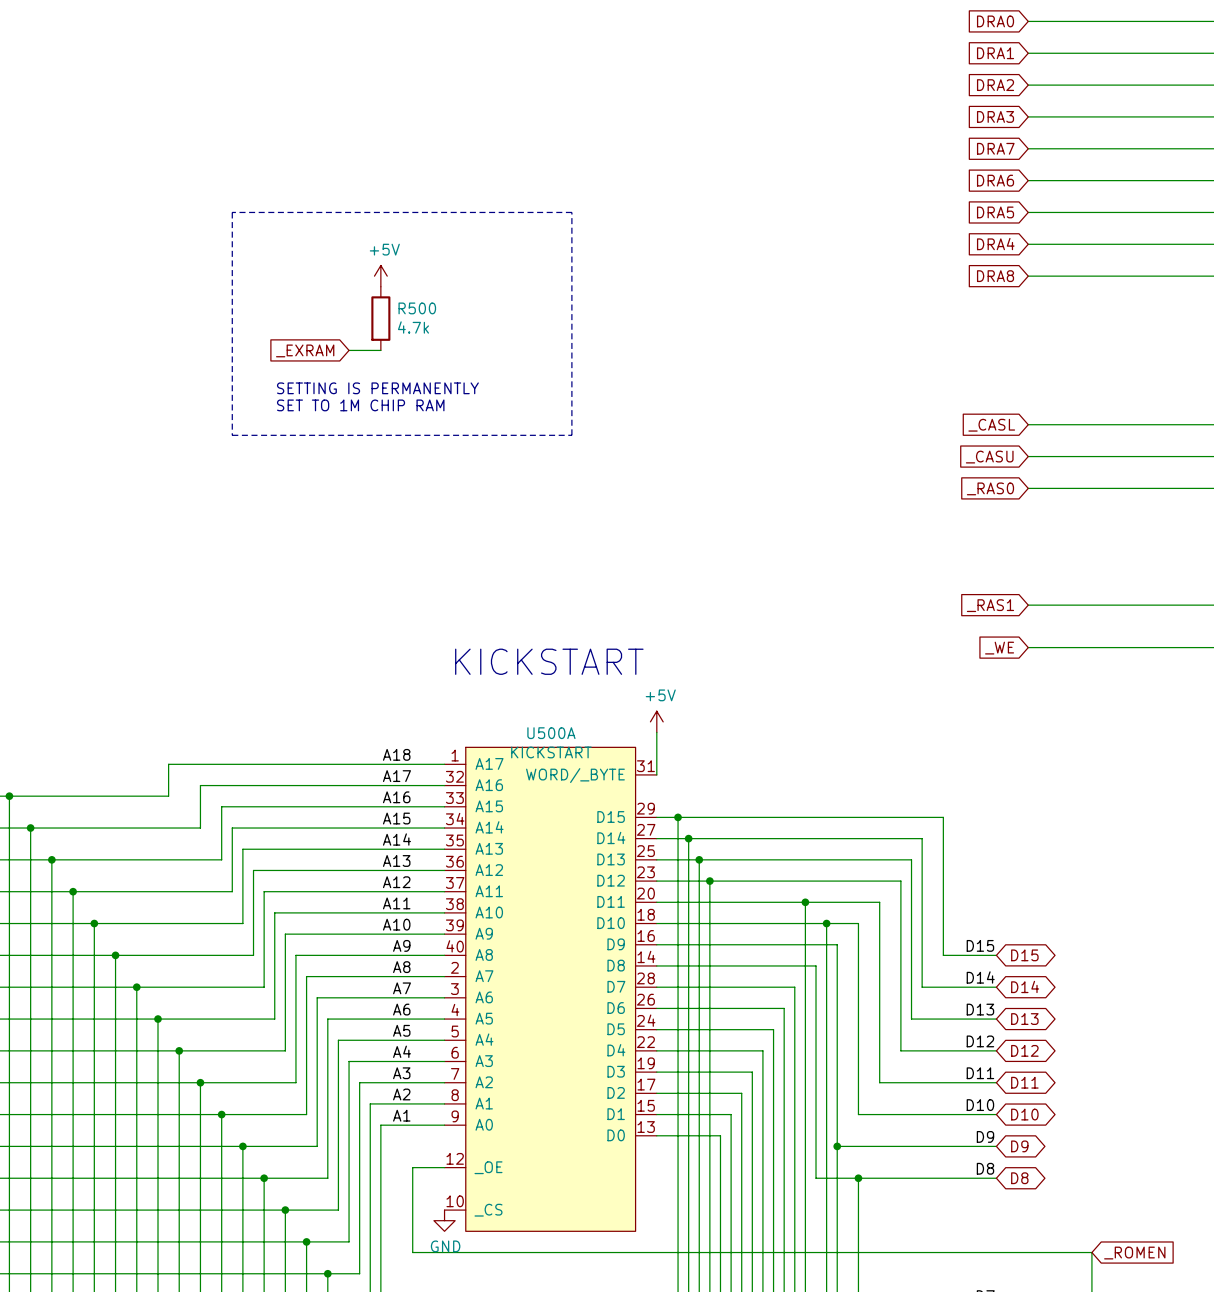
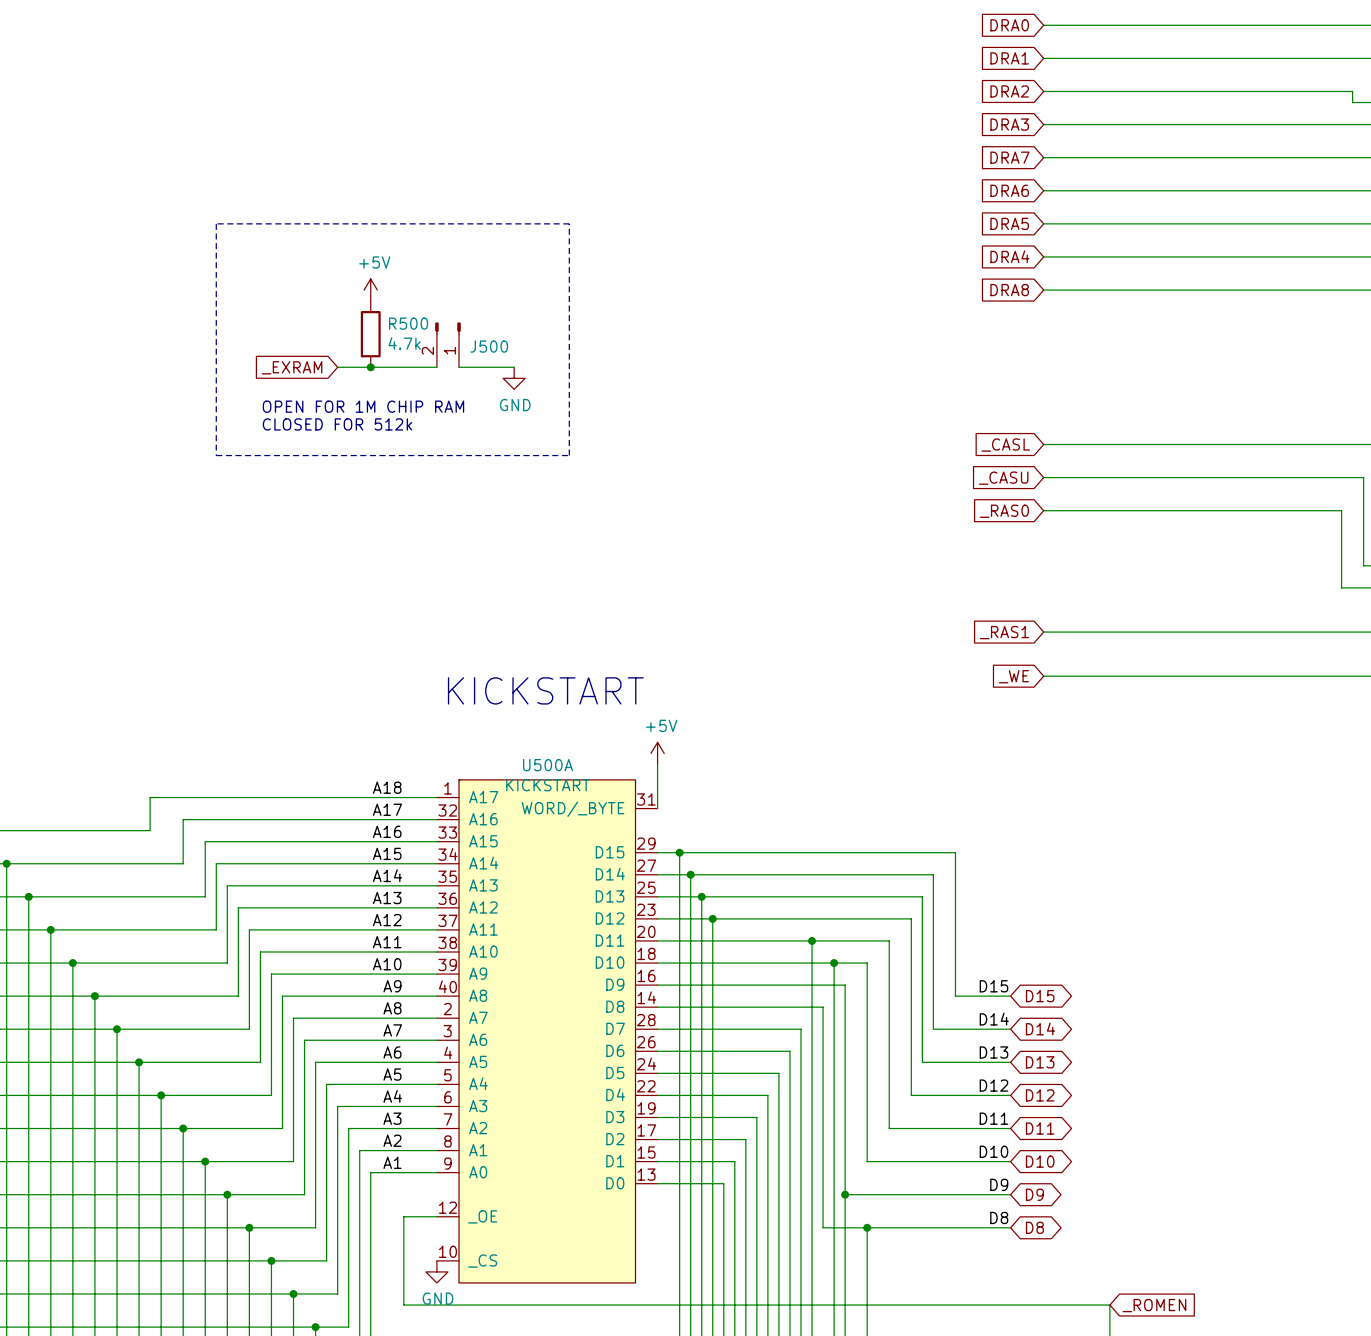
J500: none -> (447, 344)
wire: none -> (370, 367) (436, 367)
junction: none -> (370, 367)
wire: none -> (459, 367) (514, 367)
power symbol: none -> GND (514, 378)
text: SETTING IS PERMANENTLY (377, 388) -> OPEN FOR 1M CHIP RAM (363, 406)
text: SET TO 1M CHIP RAM (360, 405) -> CLOSED FOR 512k (337, 424)

